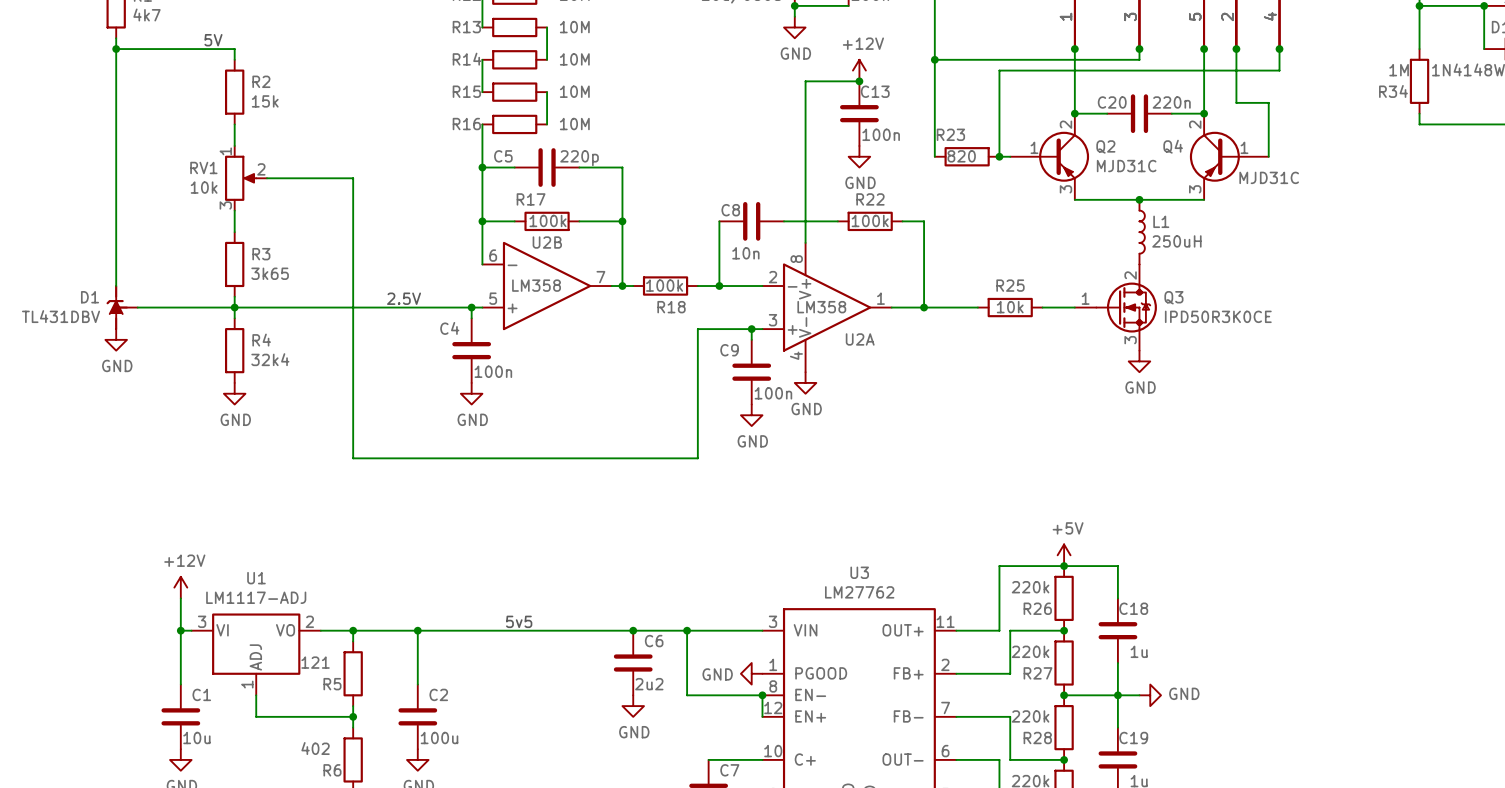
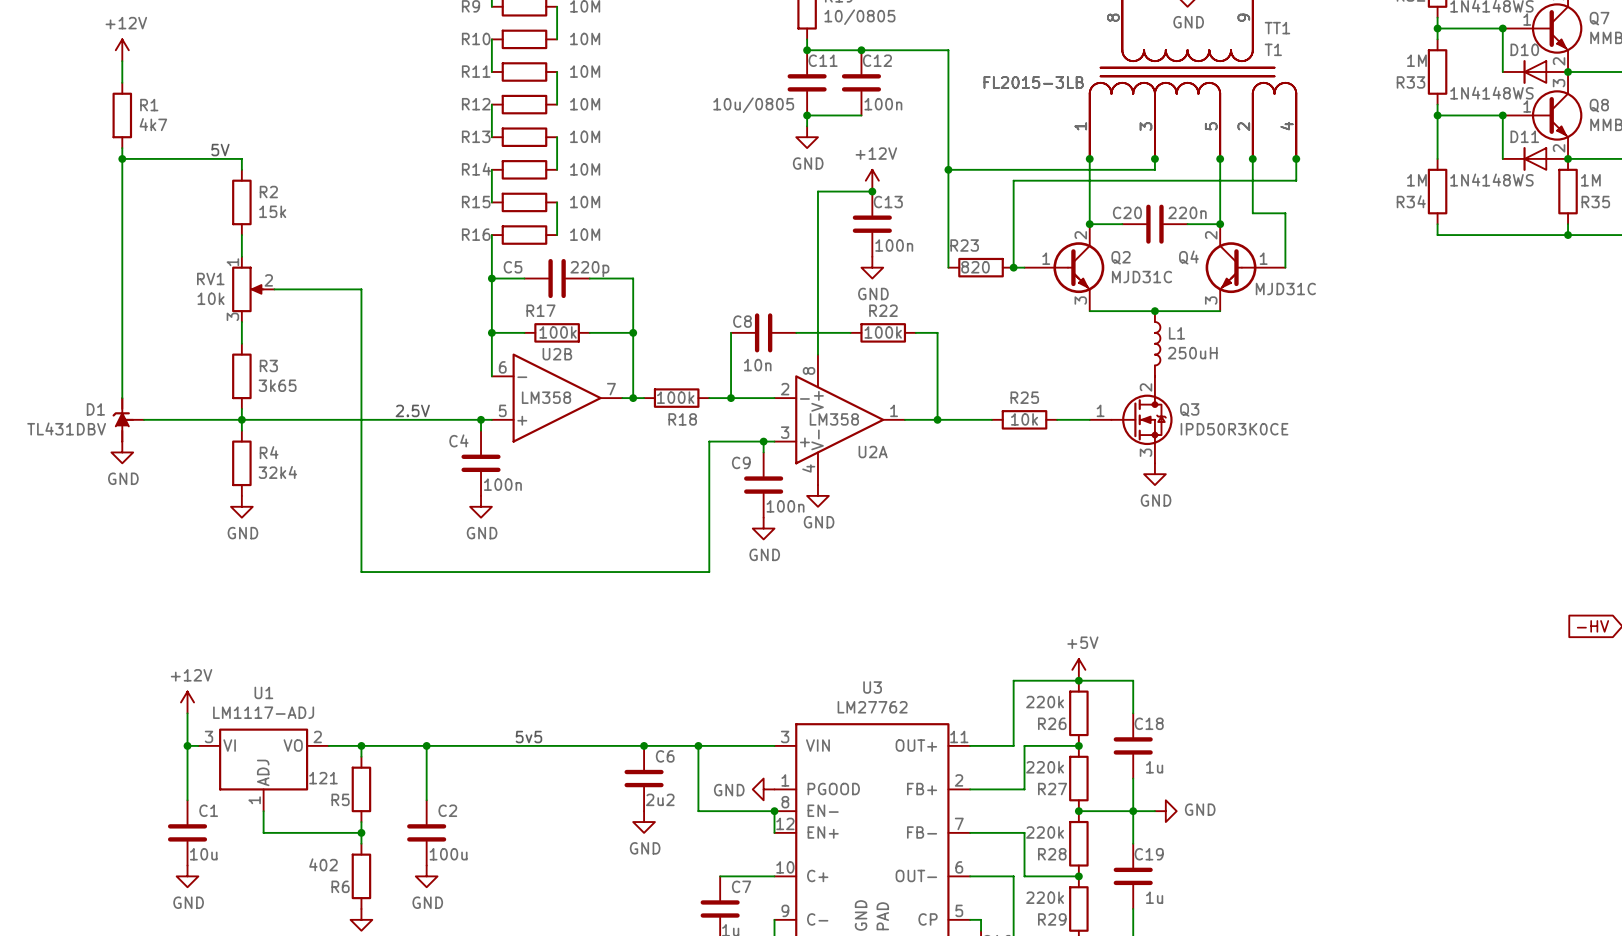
Q2 symbol: [1010, 113, 1090, 200] -> [1024, 224, 1105, 312]
Q4 symbol: [1189, 113, 1269, 200] -> [1205, 224, 1286, 312]

